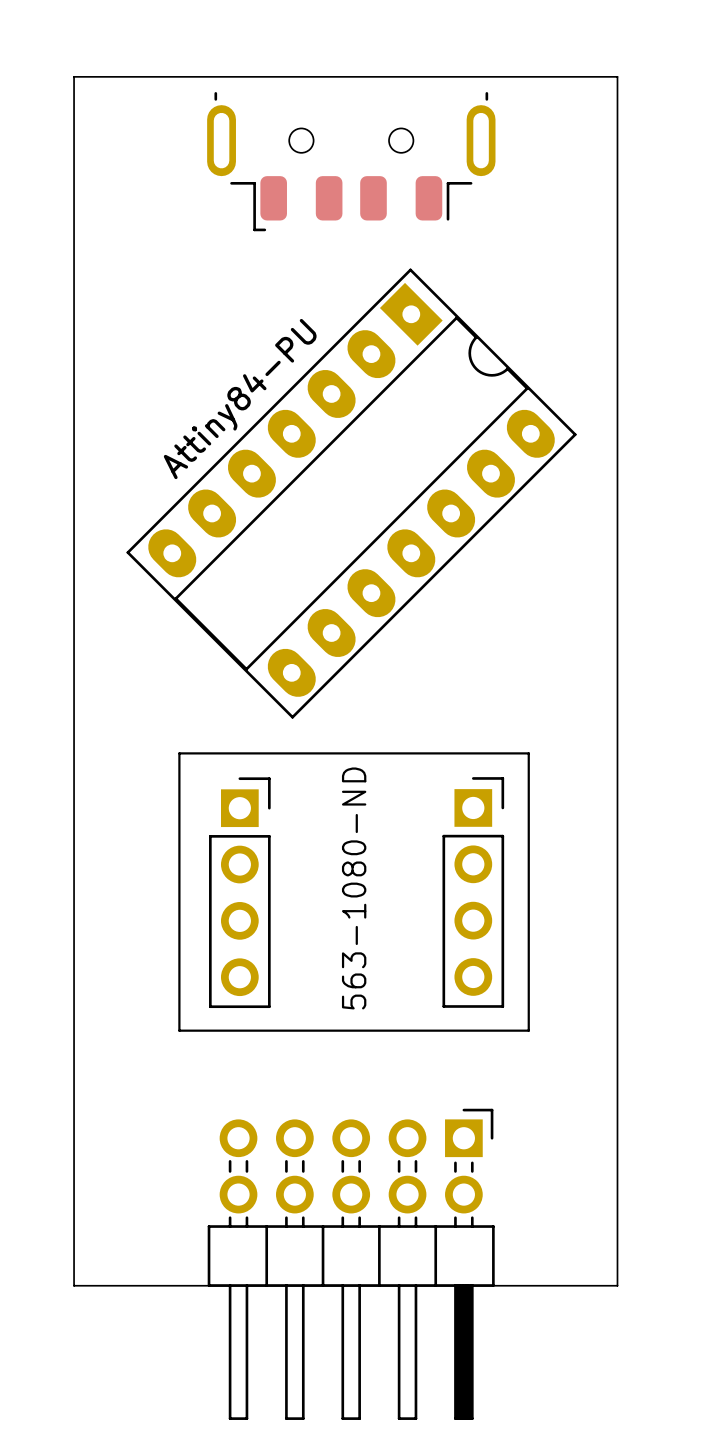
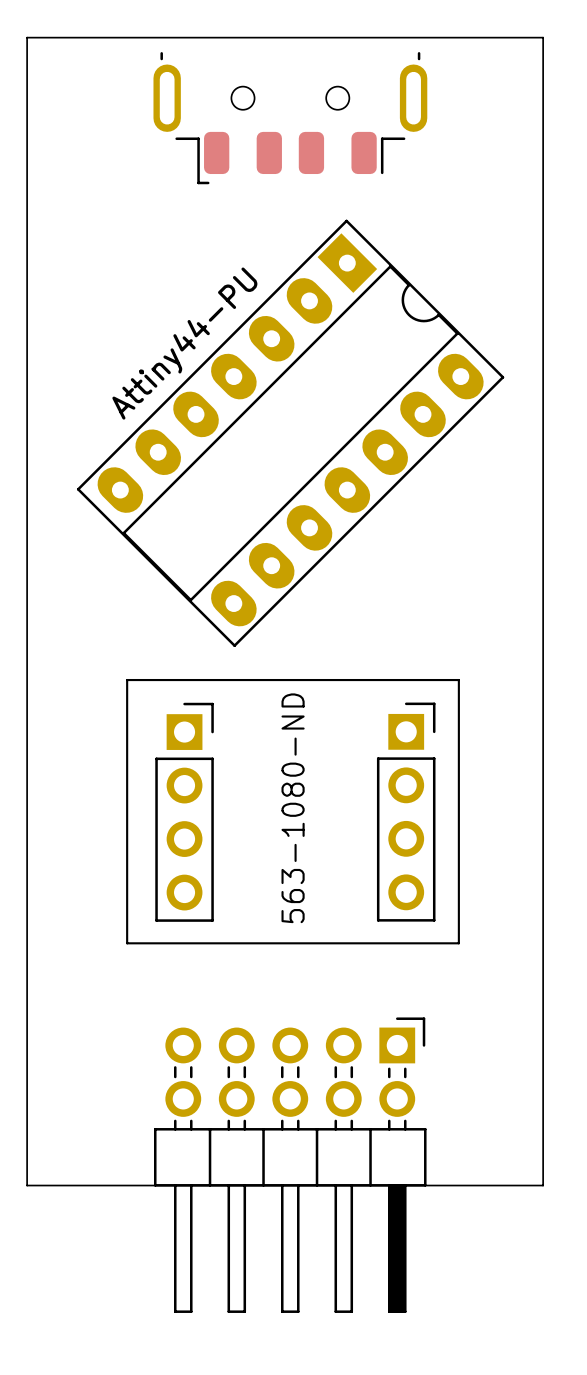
Attiny84-PU name: Attiny84-PU (240, 399) -> Attiny44-PU (184, 343)

